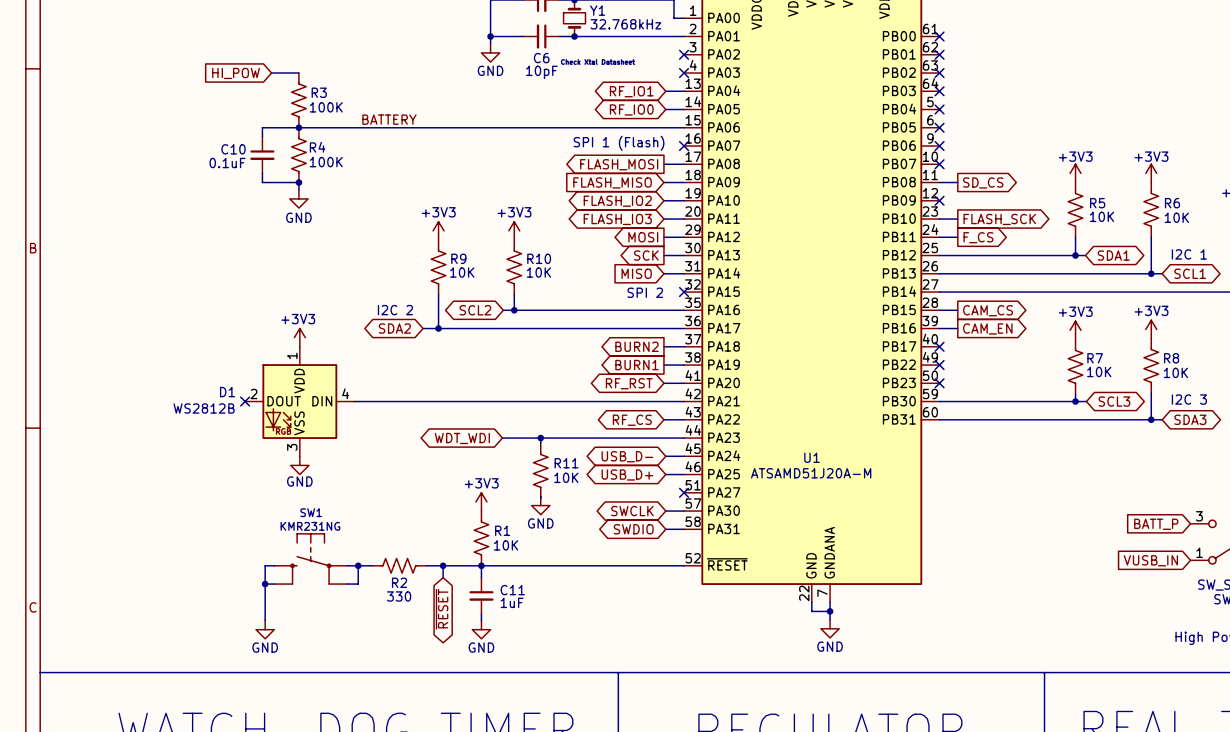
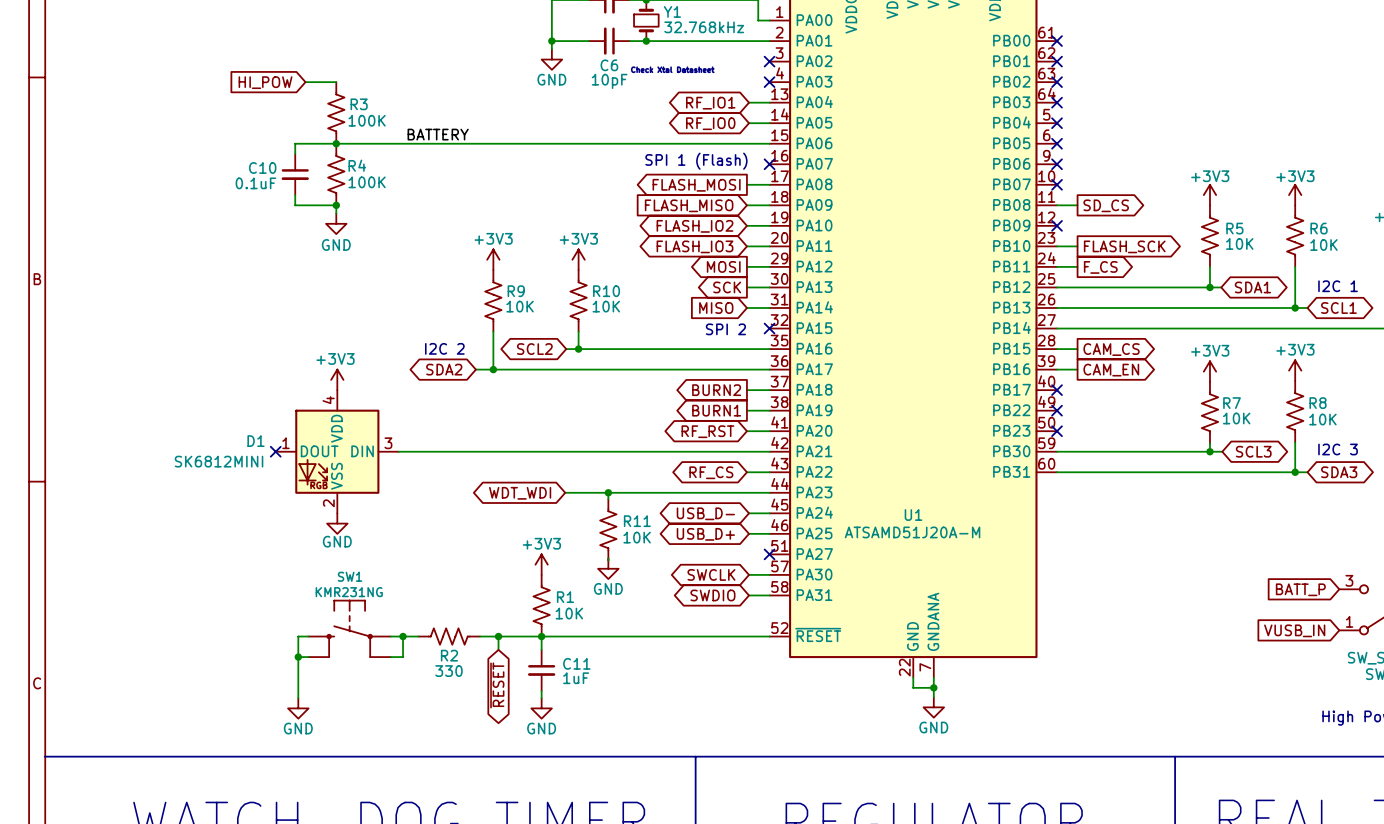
D1 pin number: 1 (292, 355) -> 4 (328, 400)
D1 pin number: 4 (345, 393) -> 3 (388, 443)
D1 pin number: 2 (253, 394) -> 1 (285, 443)
D1 value: WS2812B (204, 408) -> SK6812MINI (219, 461)
D1 pin number: 3 (292, 447) -> 2 (328, 503)

